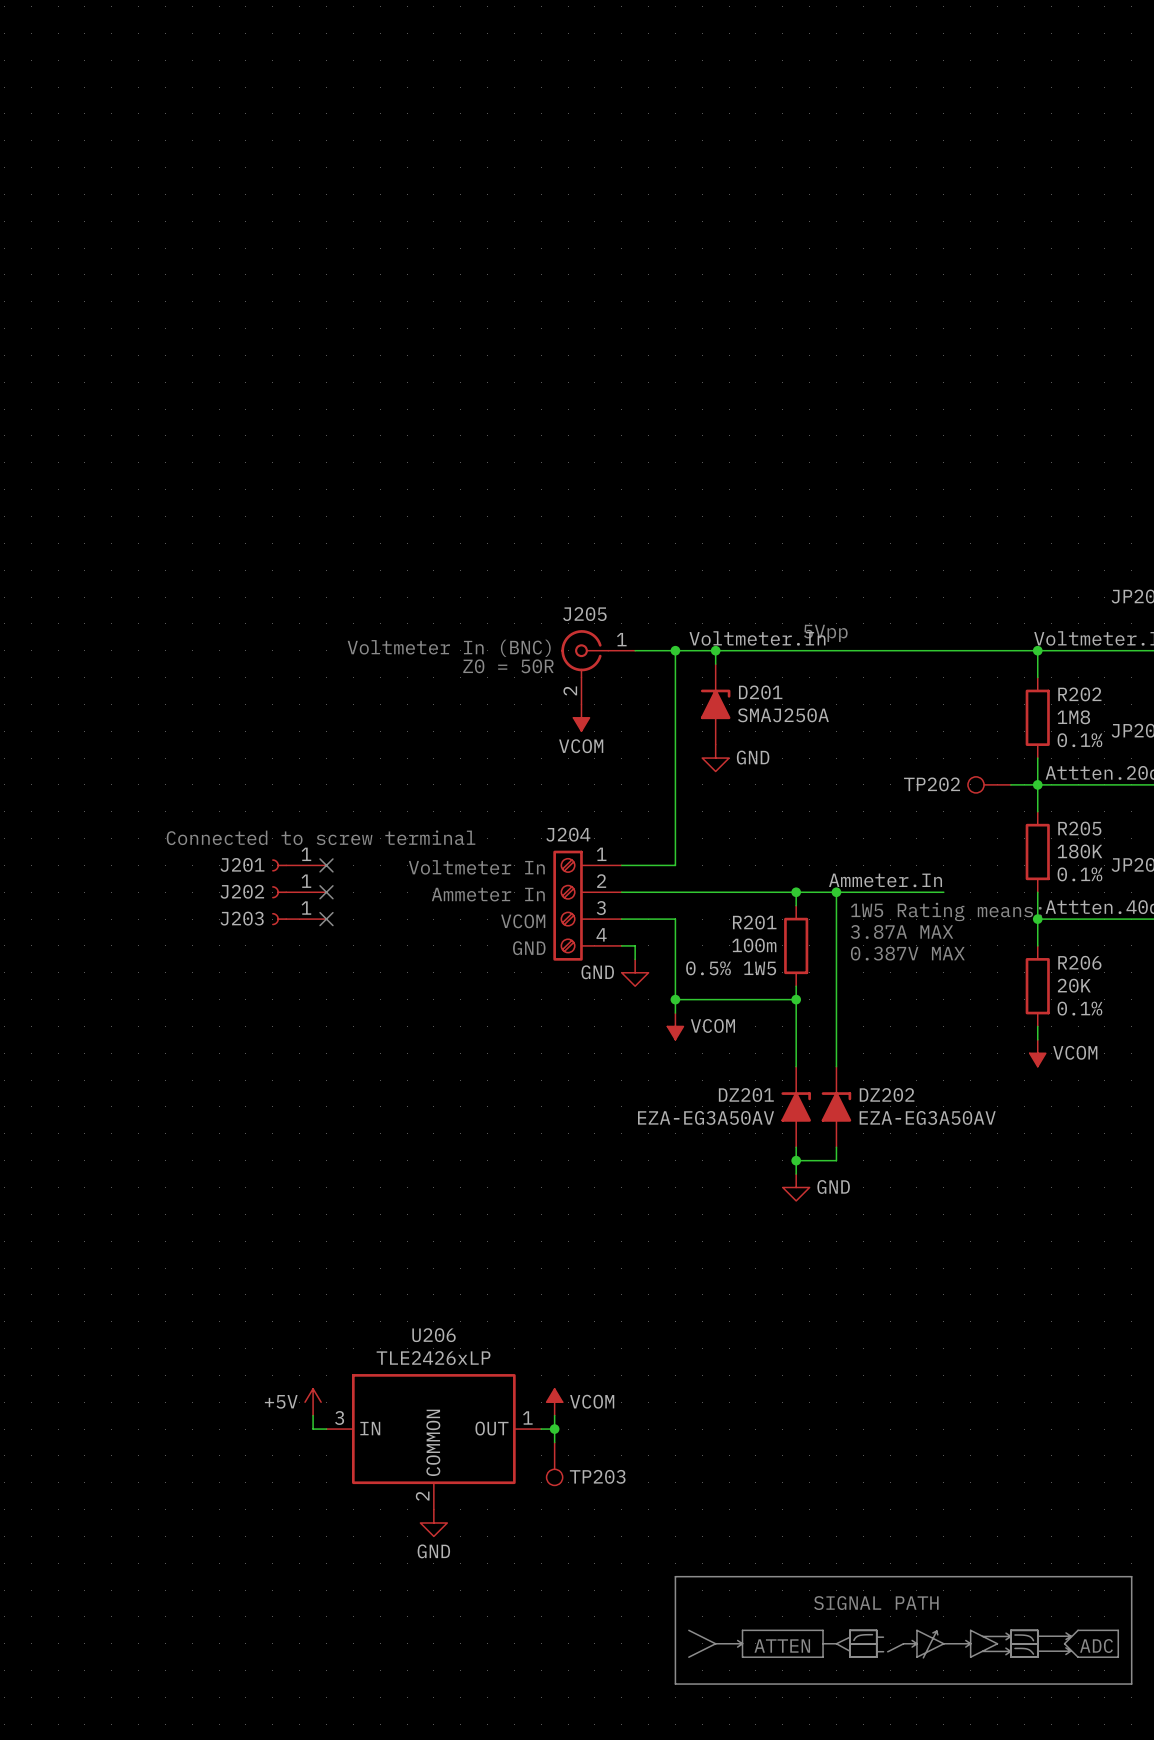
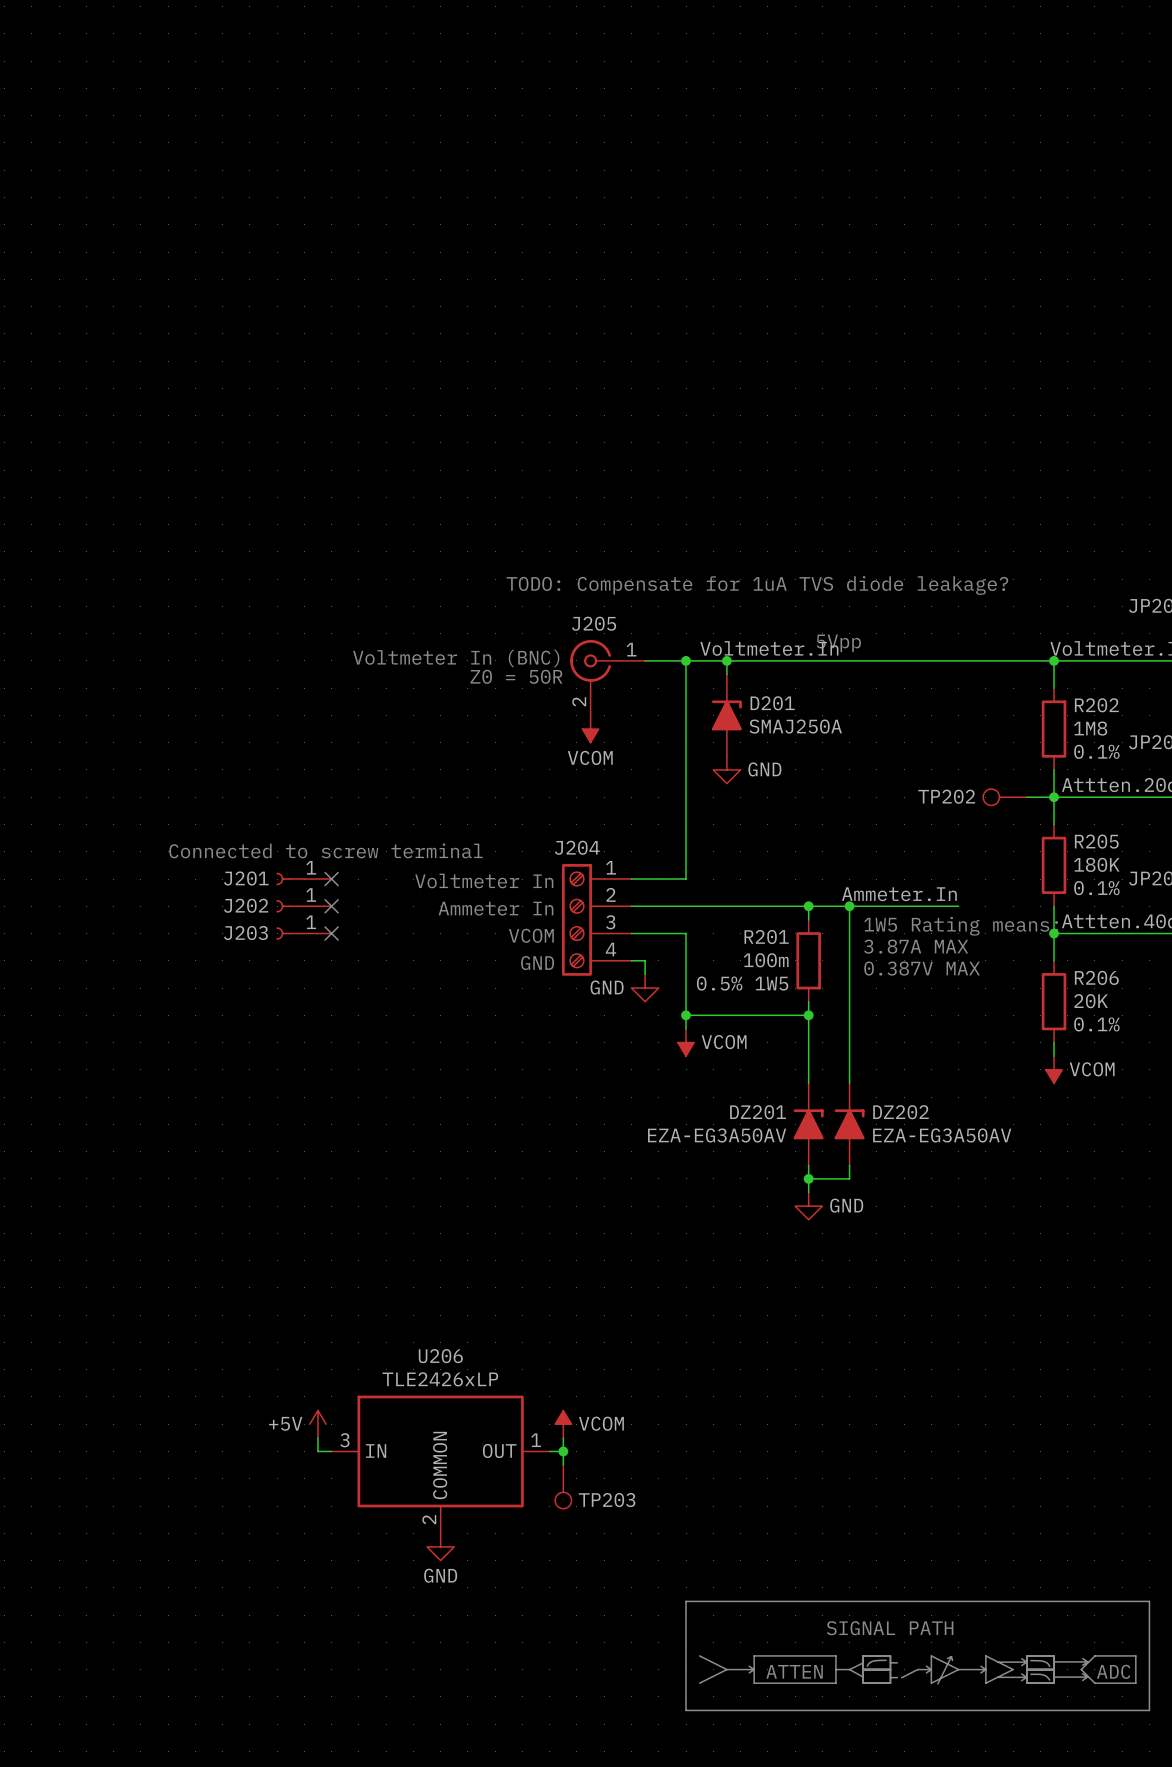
text: none -> TODO: Compensate for 1uA TVS diode leakage? (757, 585)

